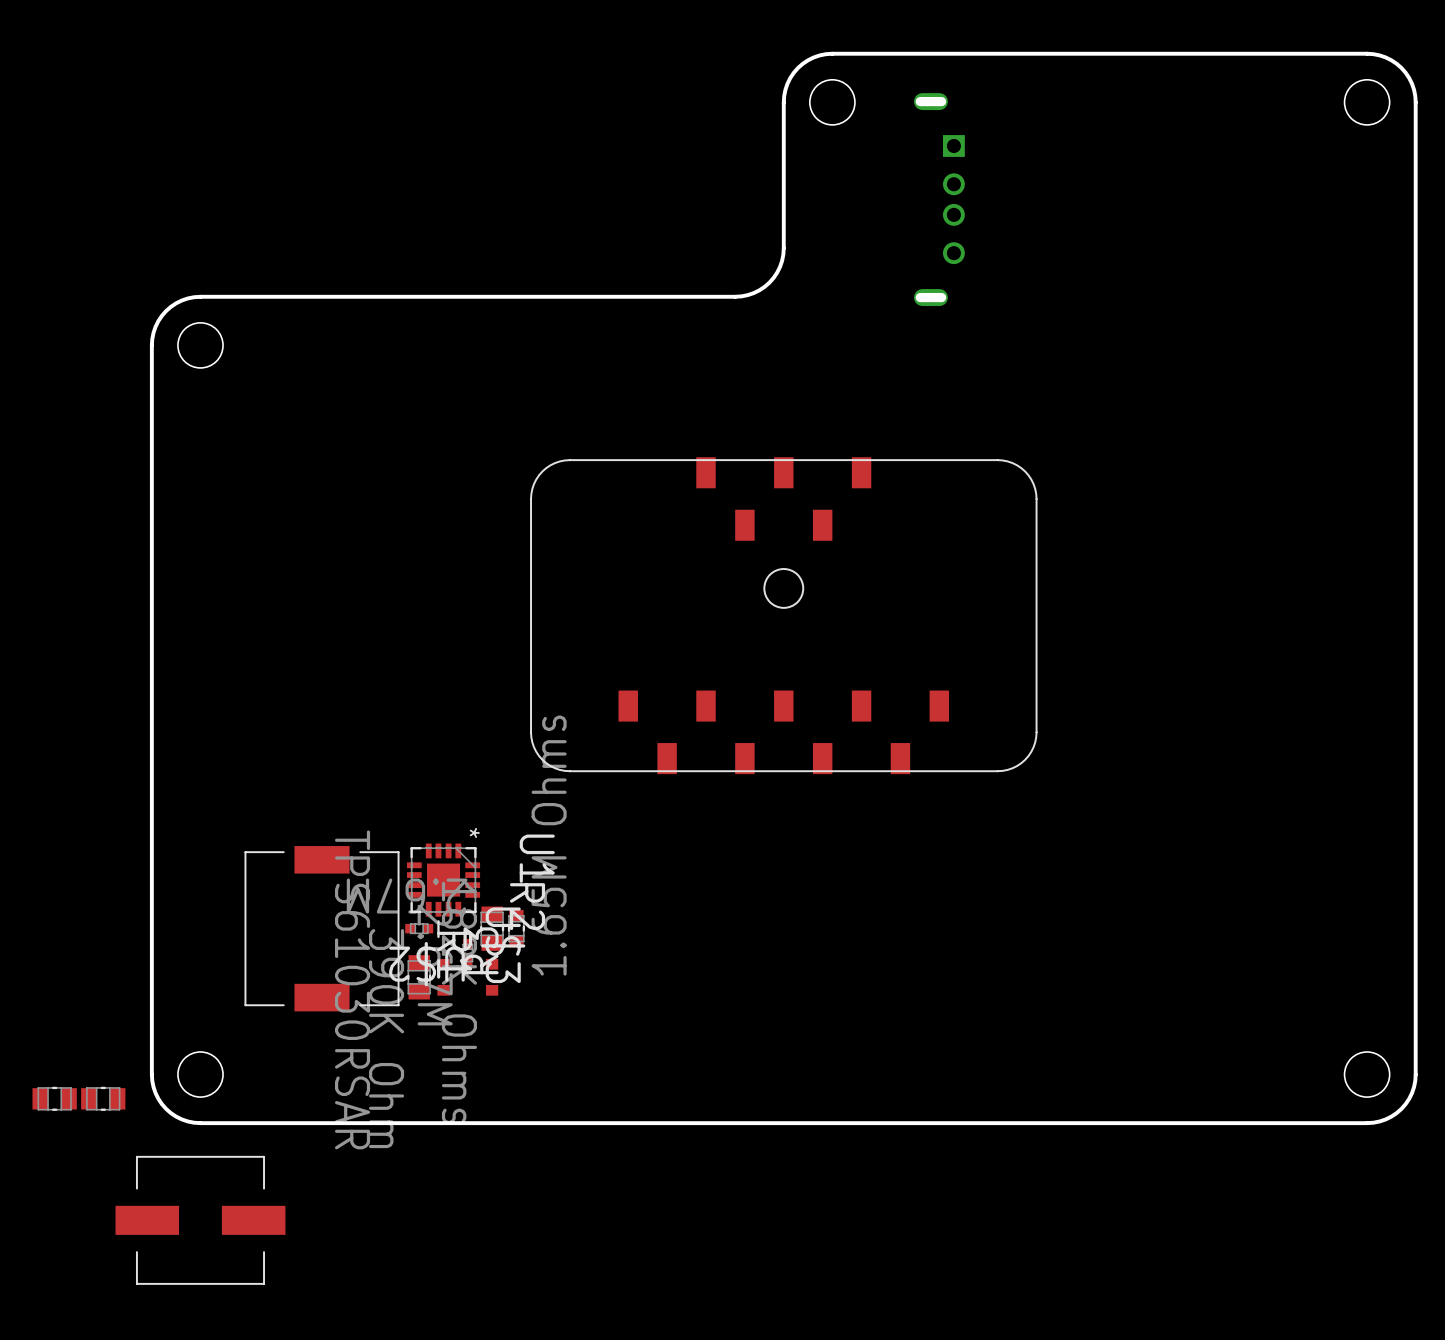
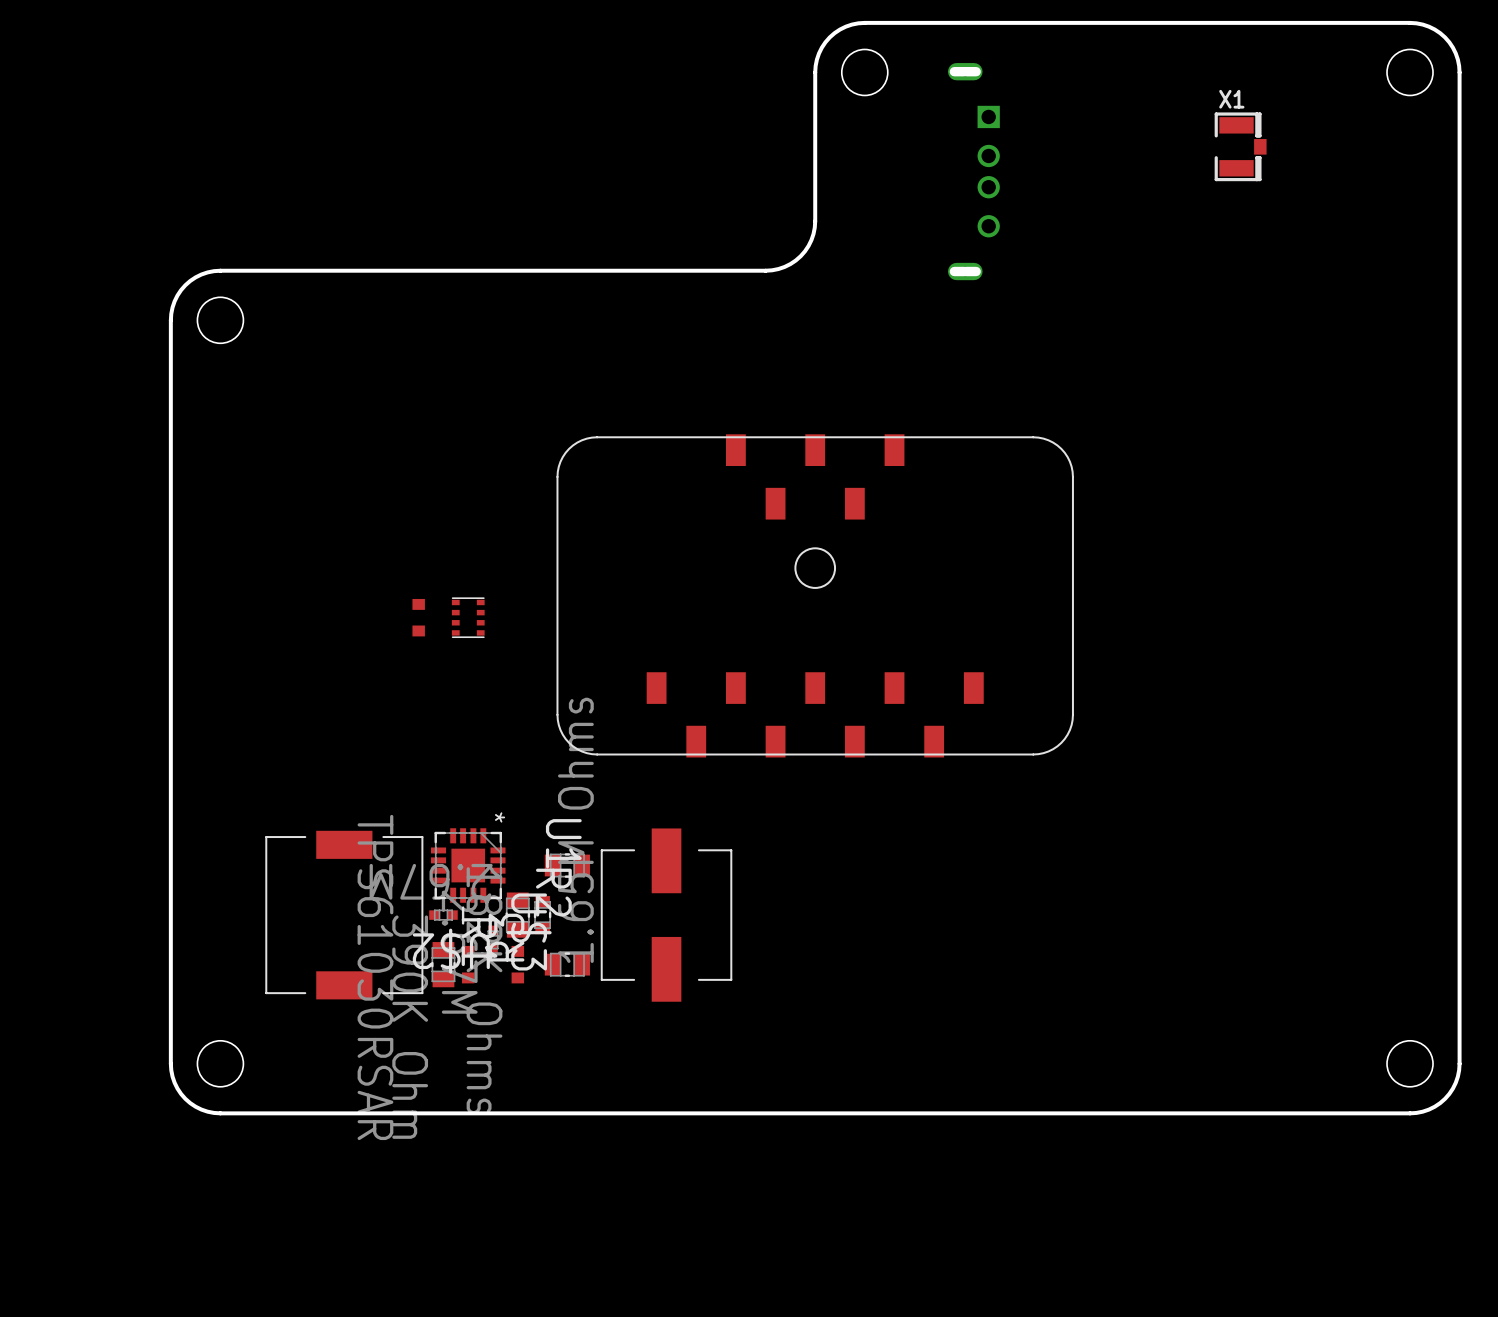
X1: none -> (1240, 146)
part: none -> (418, 617)
part: none -> (468, 617)
part: none -> (567, 865)
part: none -> (666, 915)
part: none -> (567, 964)
part: (54, 1098) -> none
part: (103, 1098) -> none
part: (200, 1220) -> none

